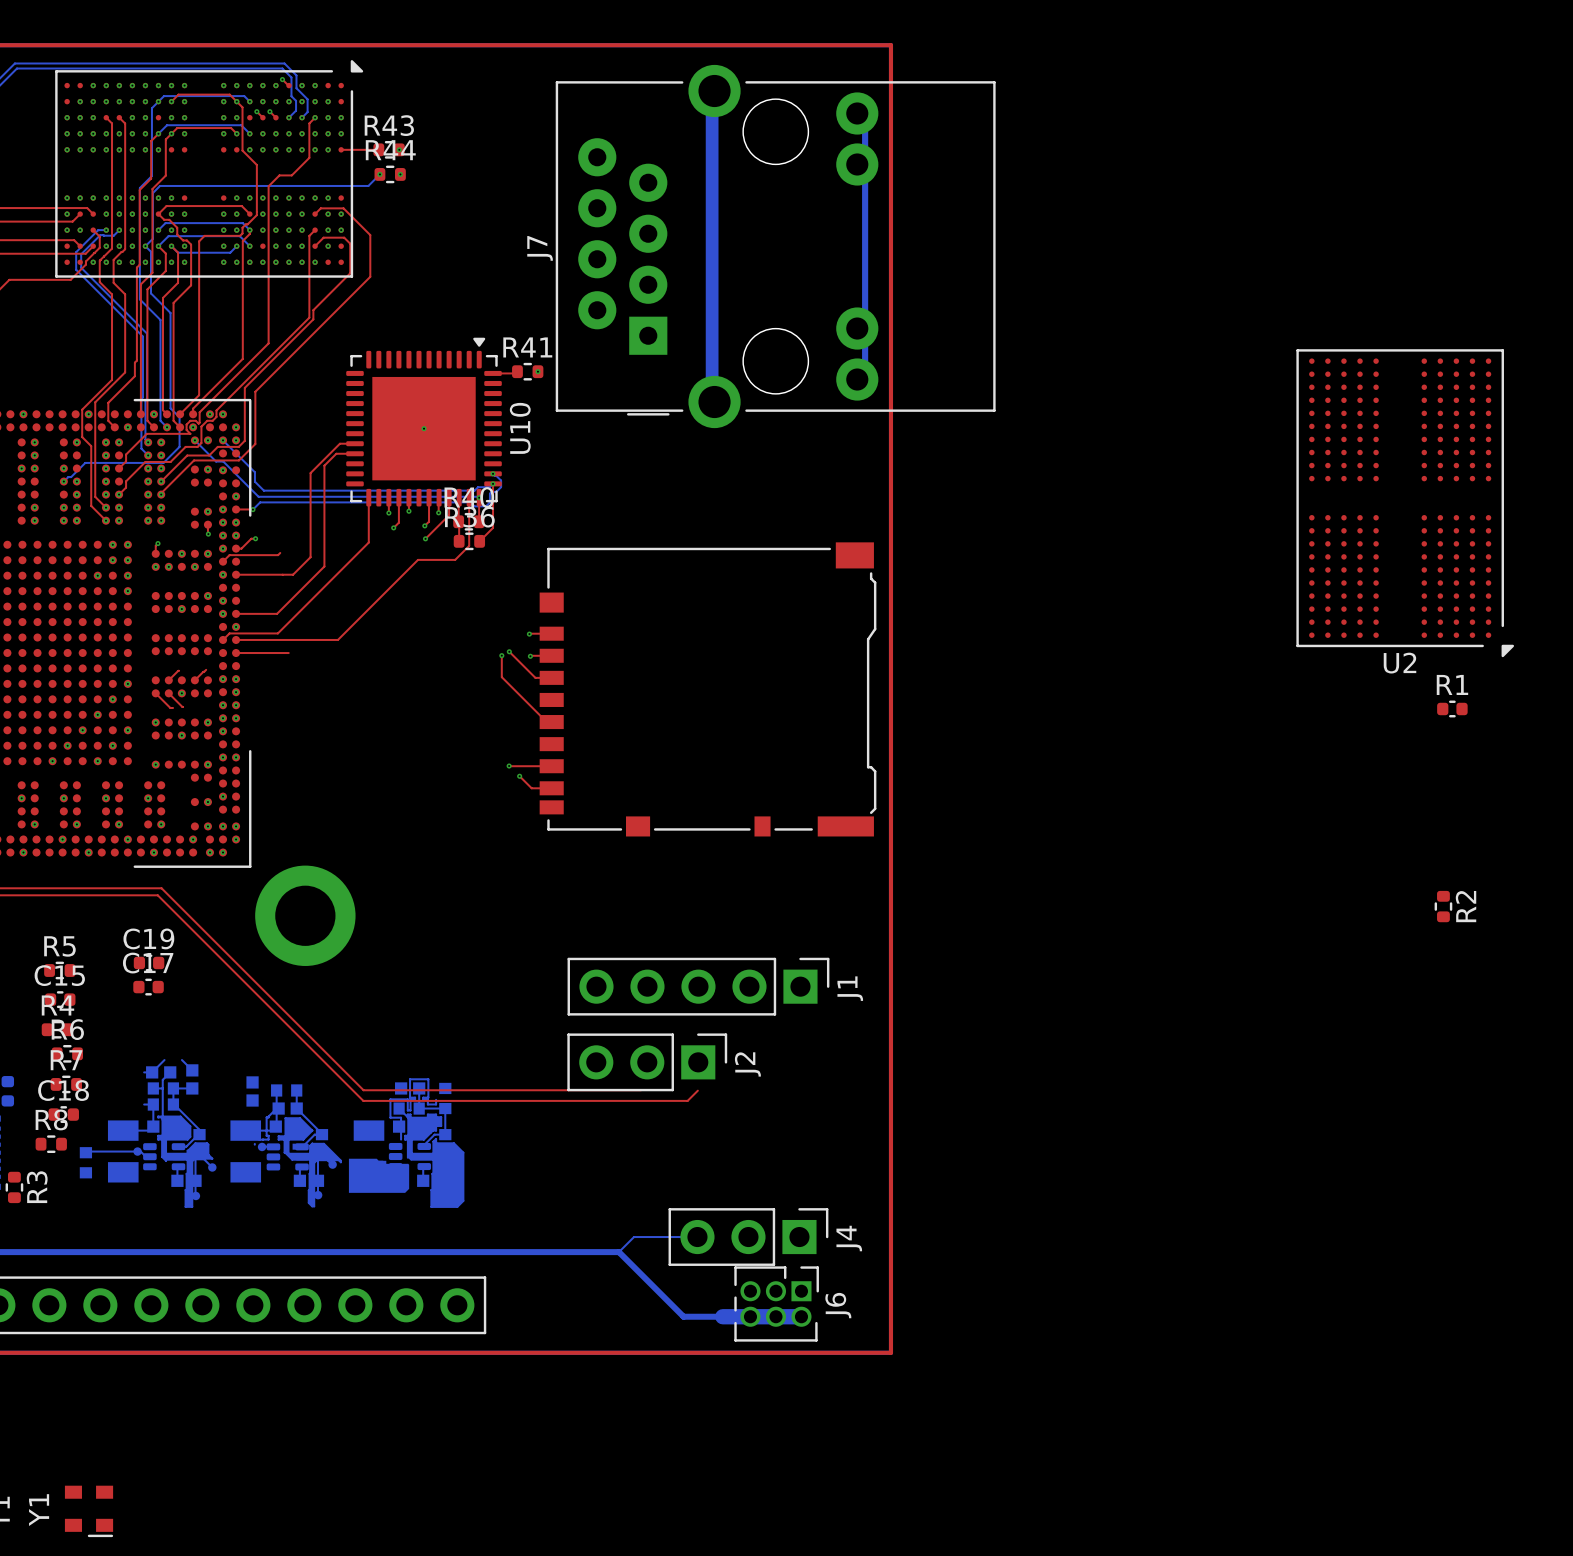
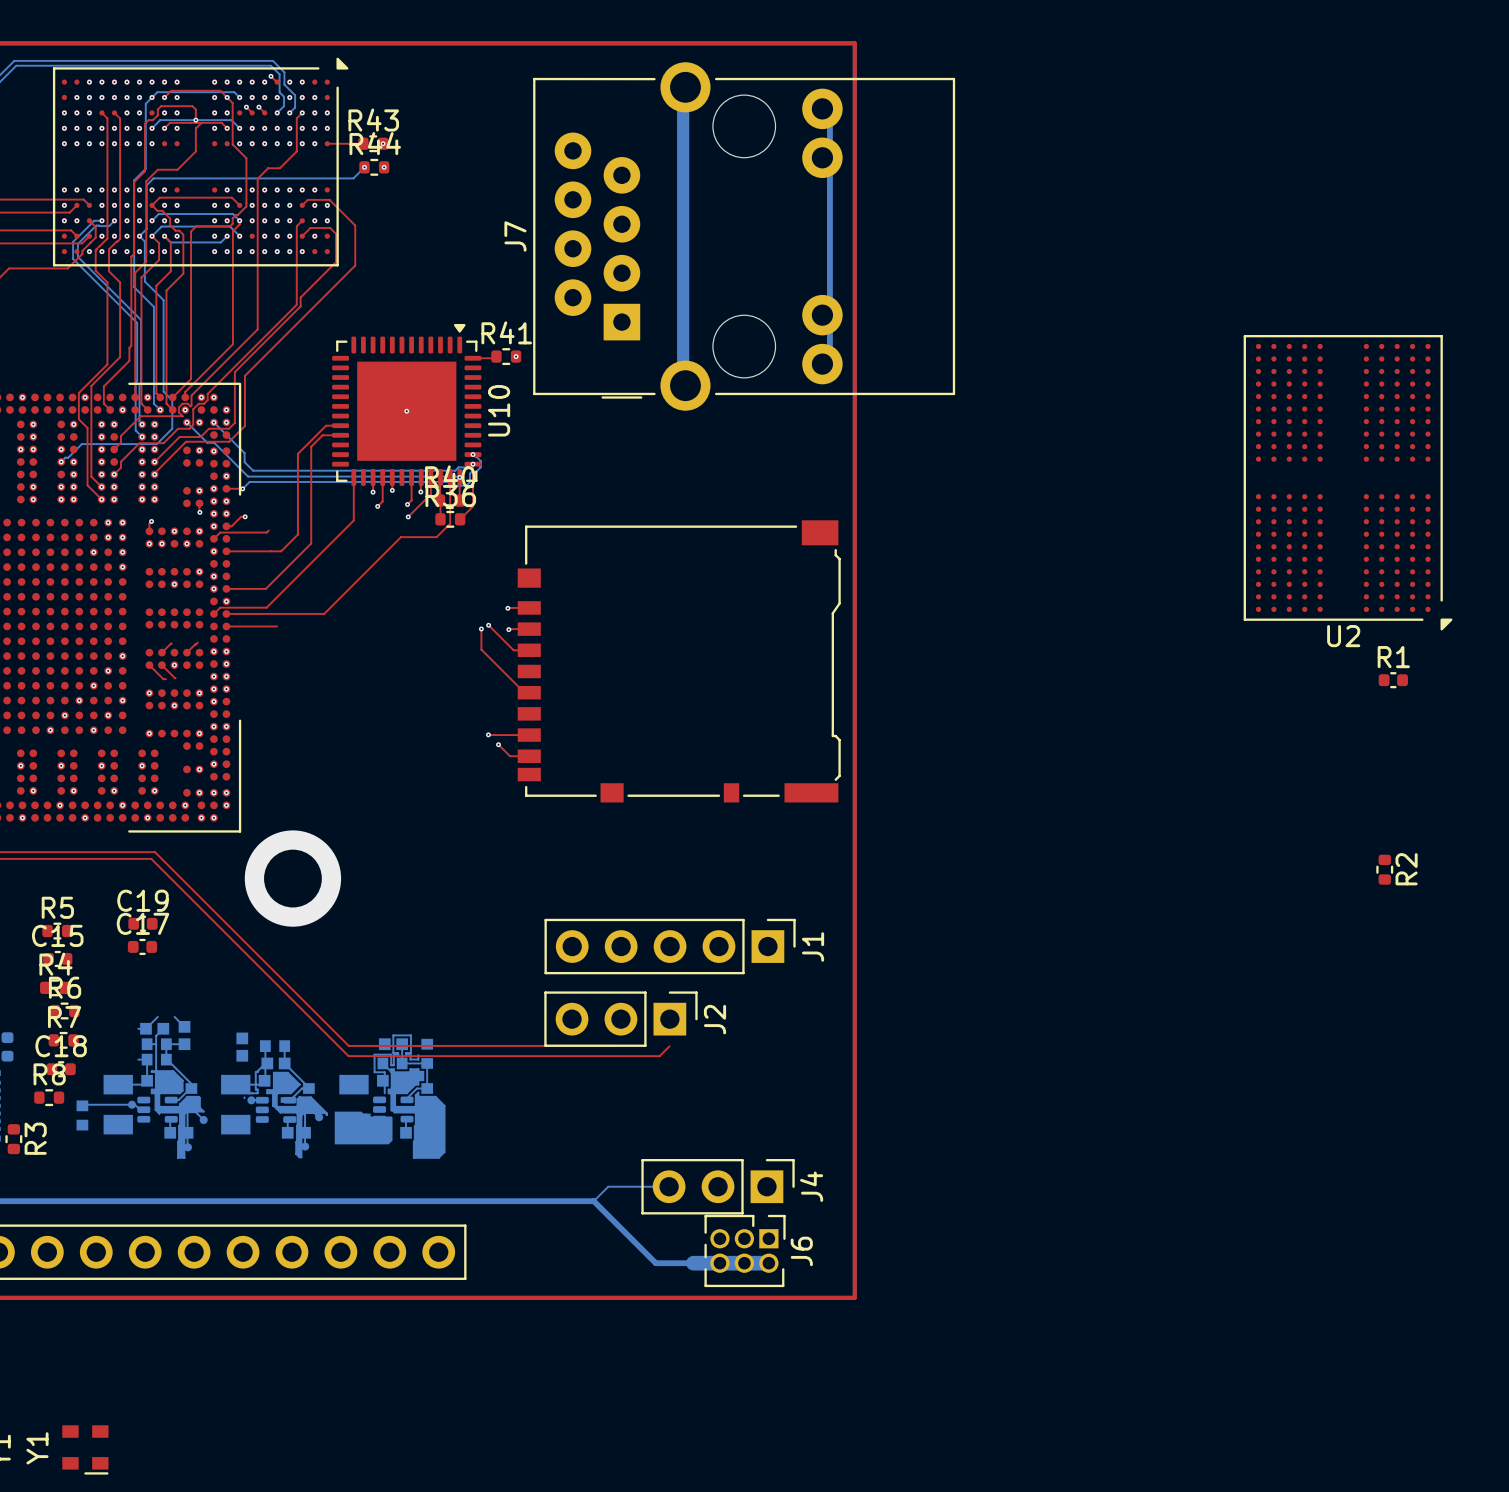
via: none -> (195, 120)
top track: none -> (201, 122) (195, 128)
top track: (158, 133) (151, 141) -> (195, 120) (195, 109) (192, 106) (161, 106) (157, 109) (157, 115) (145, 123) (145, 135)
top track: (171, 133) (165, 139) (164, 176) -> (195, 127) (195, 151) (177, 169) (157, 169)

